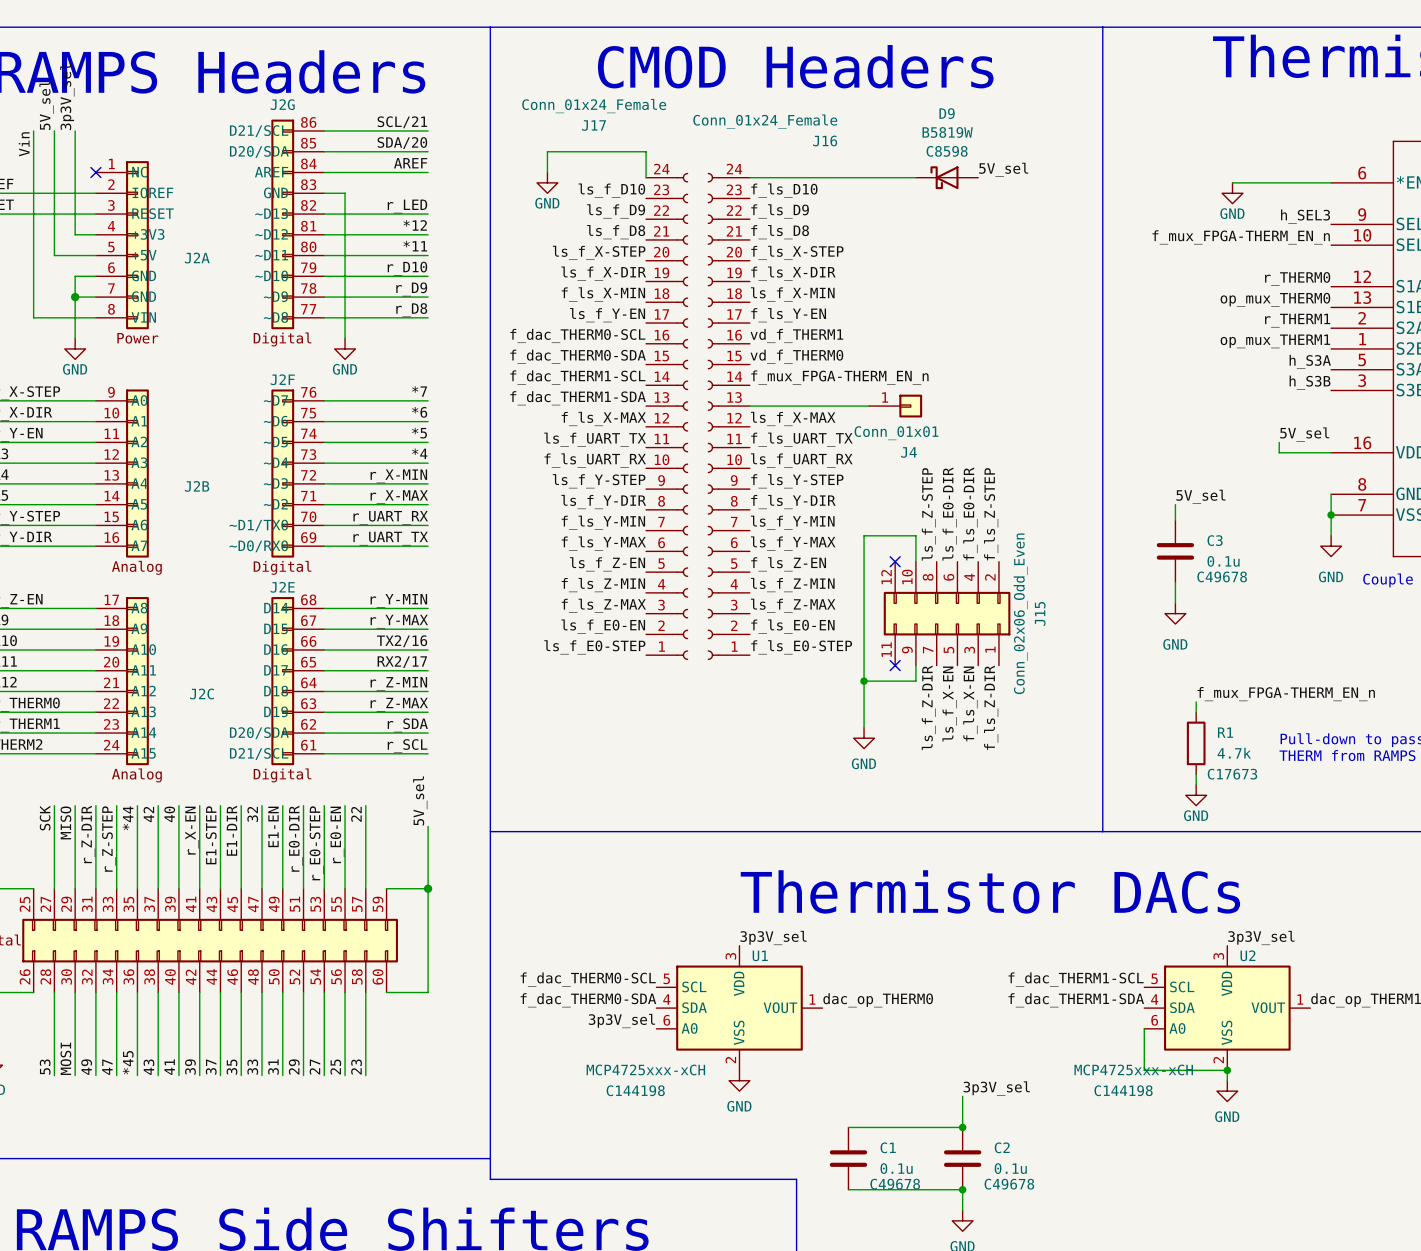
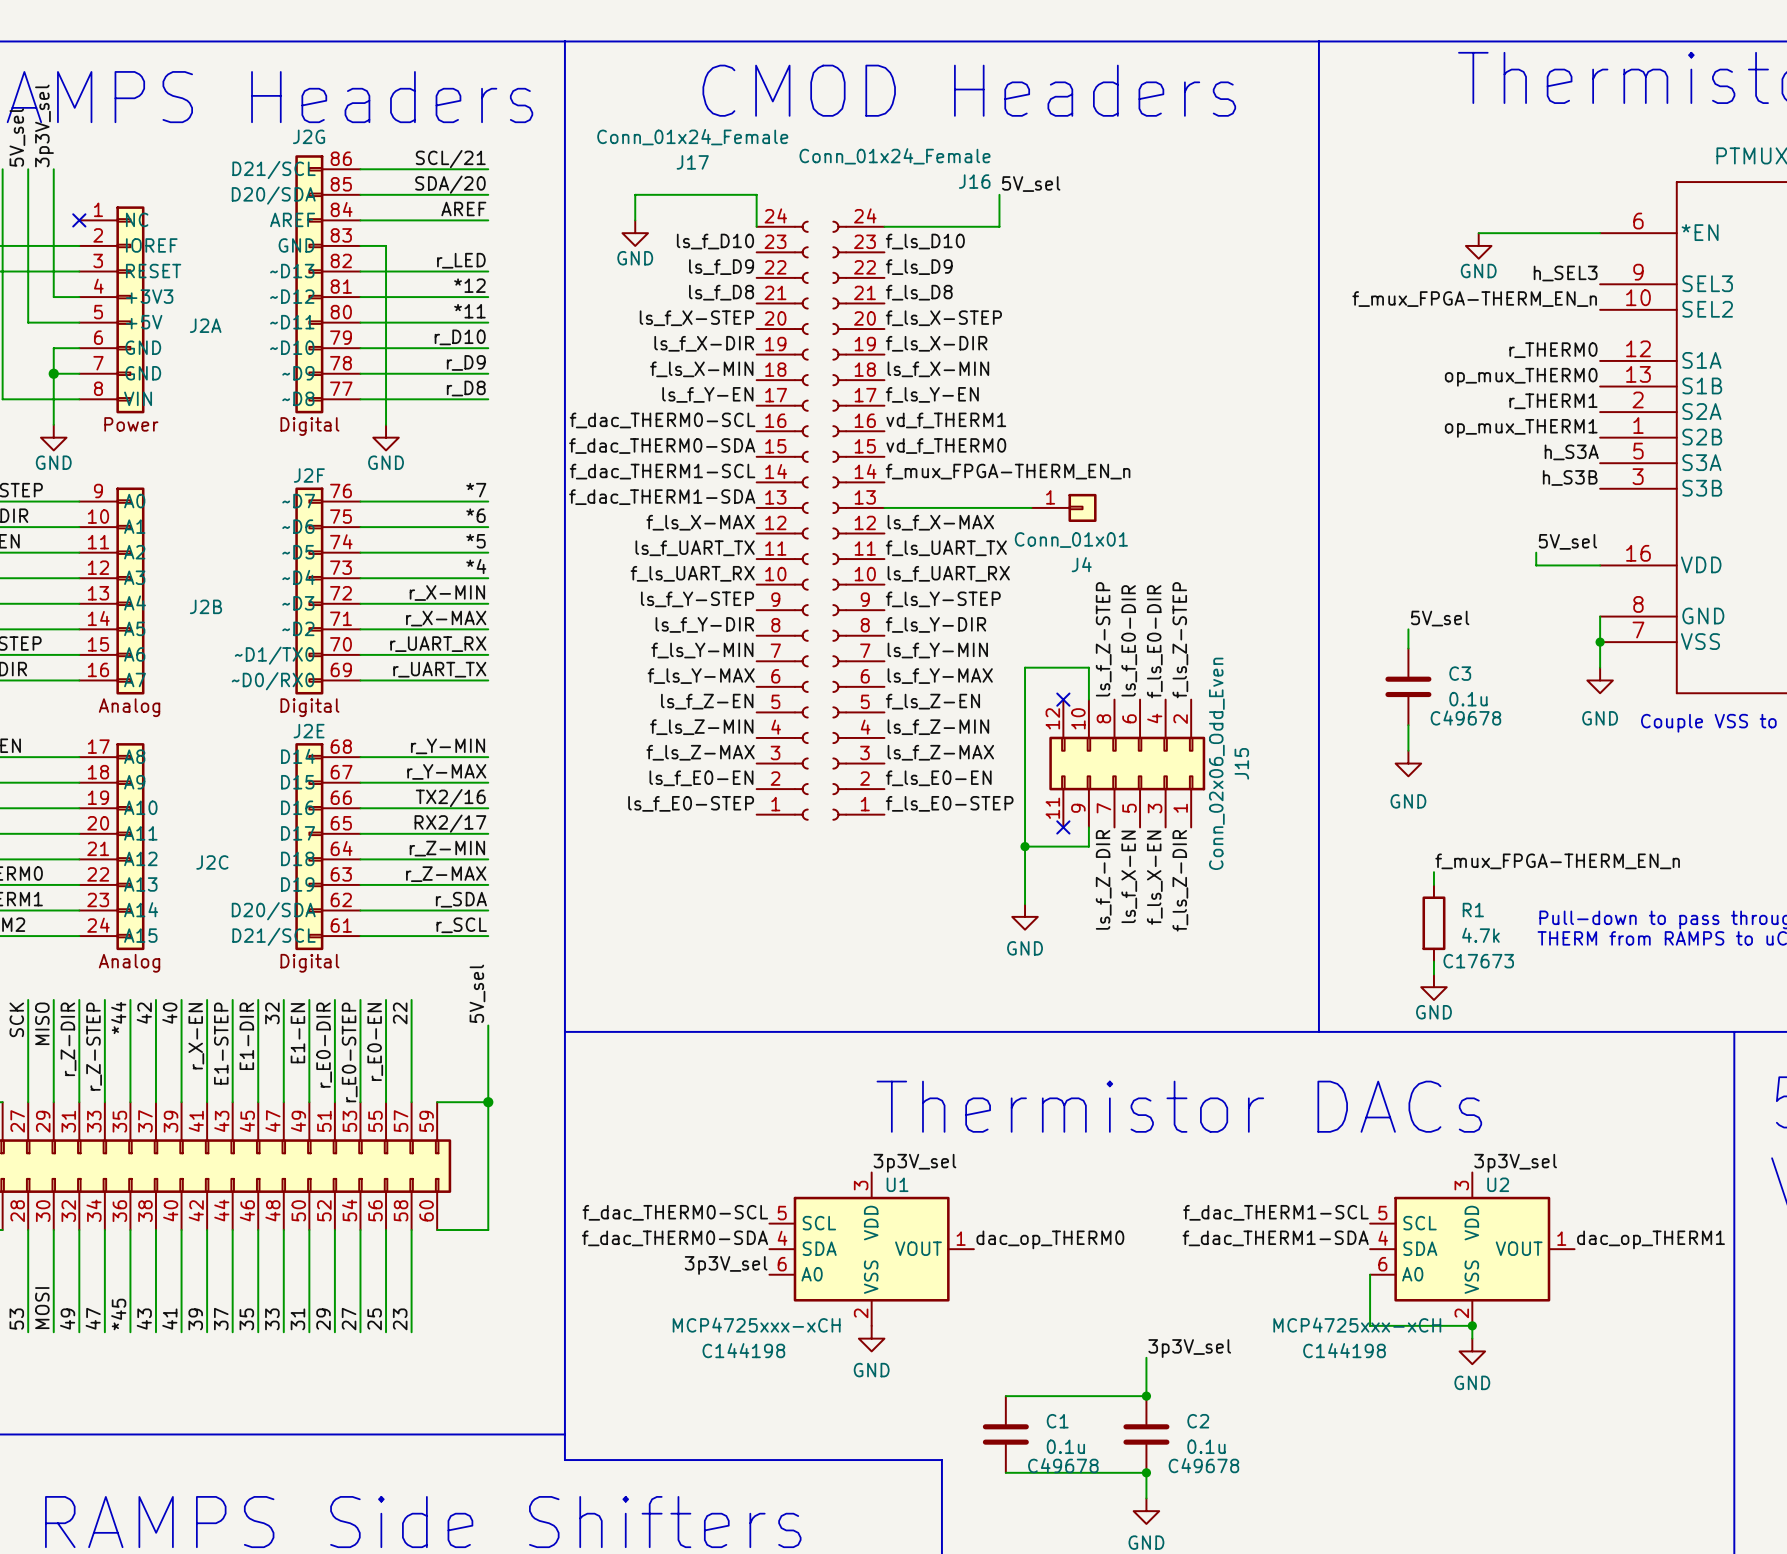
label position: 5V_sel (1003, 169) -> 5V_sel (1031, 184)
wire: (843, 177) (915, 177) -> (999, 226) (999, 194)
D9: B5819W (947, 177) -> none

